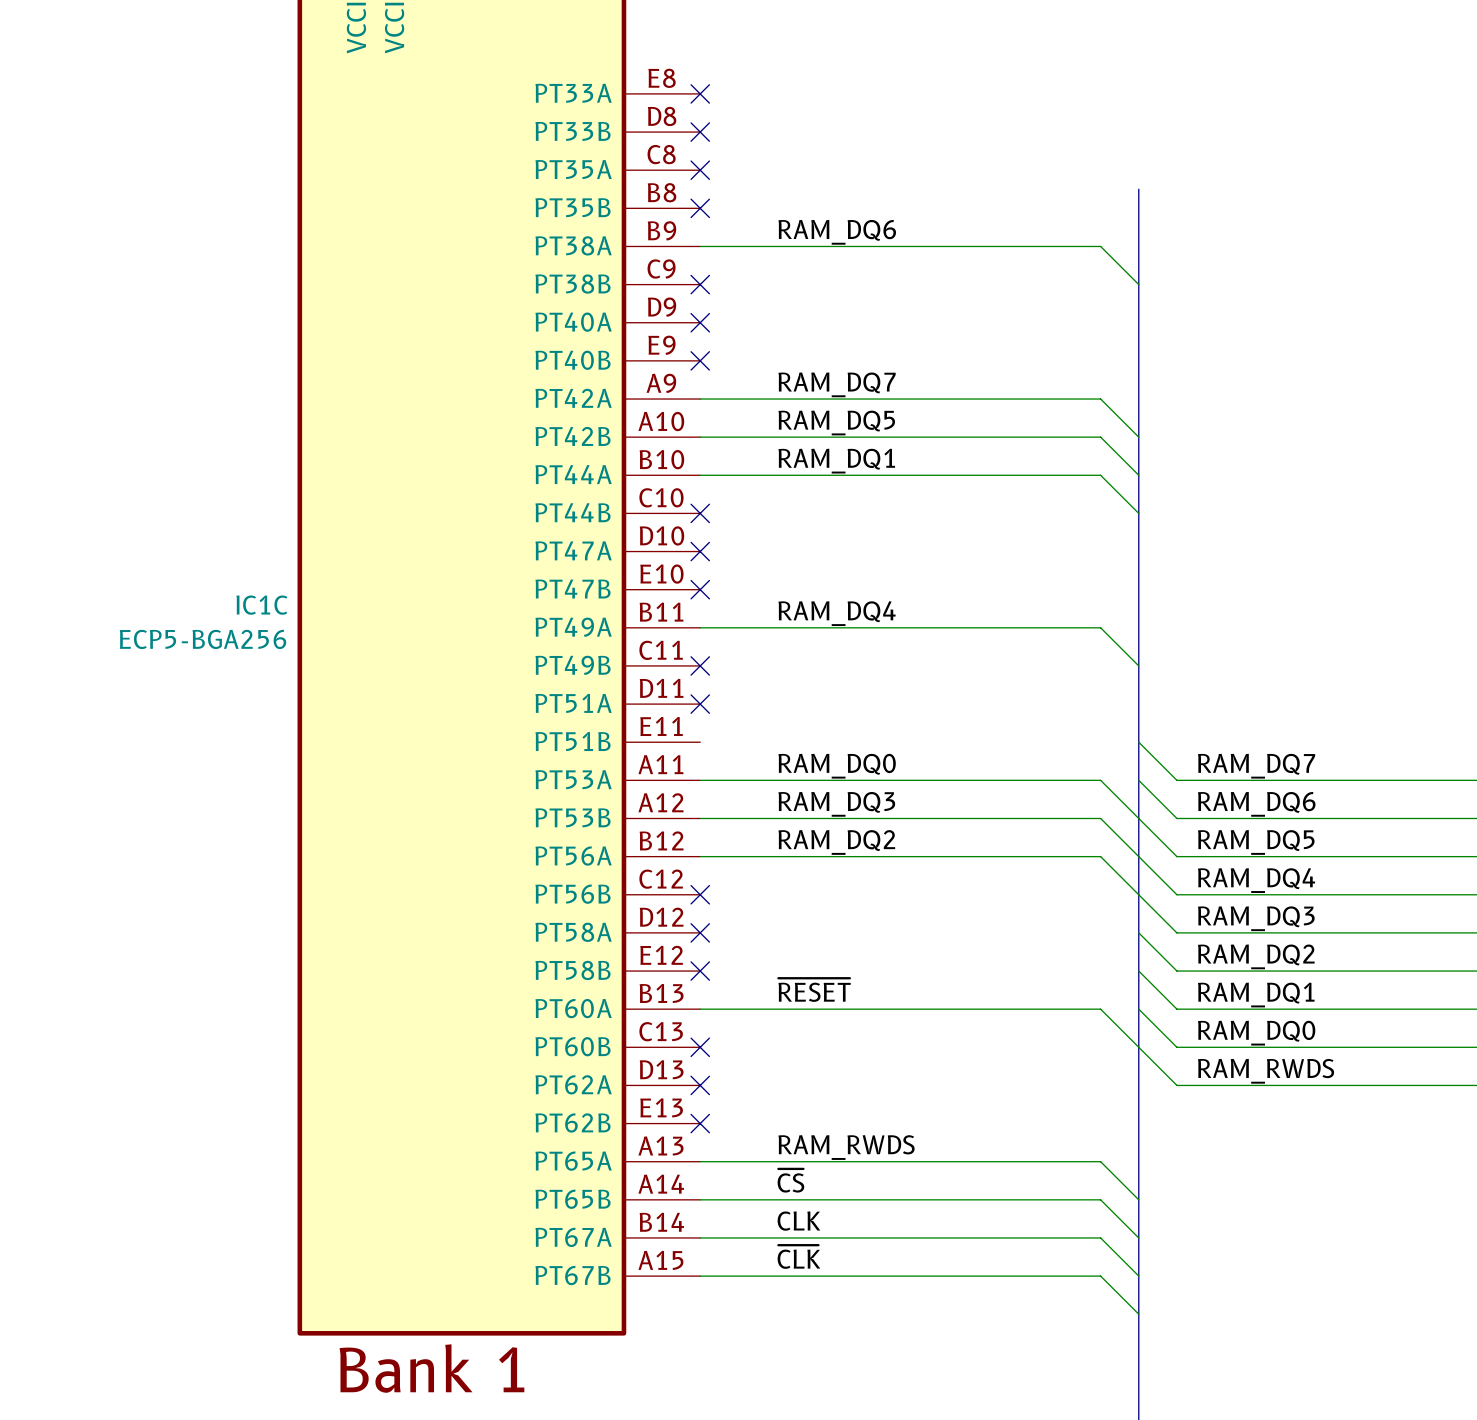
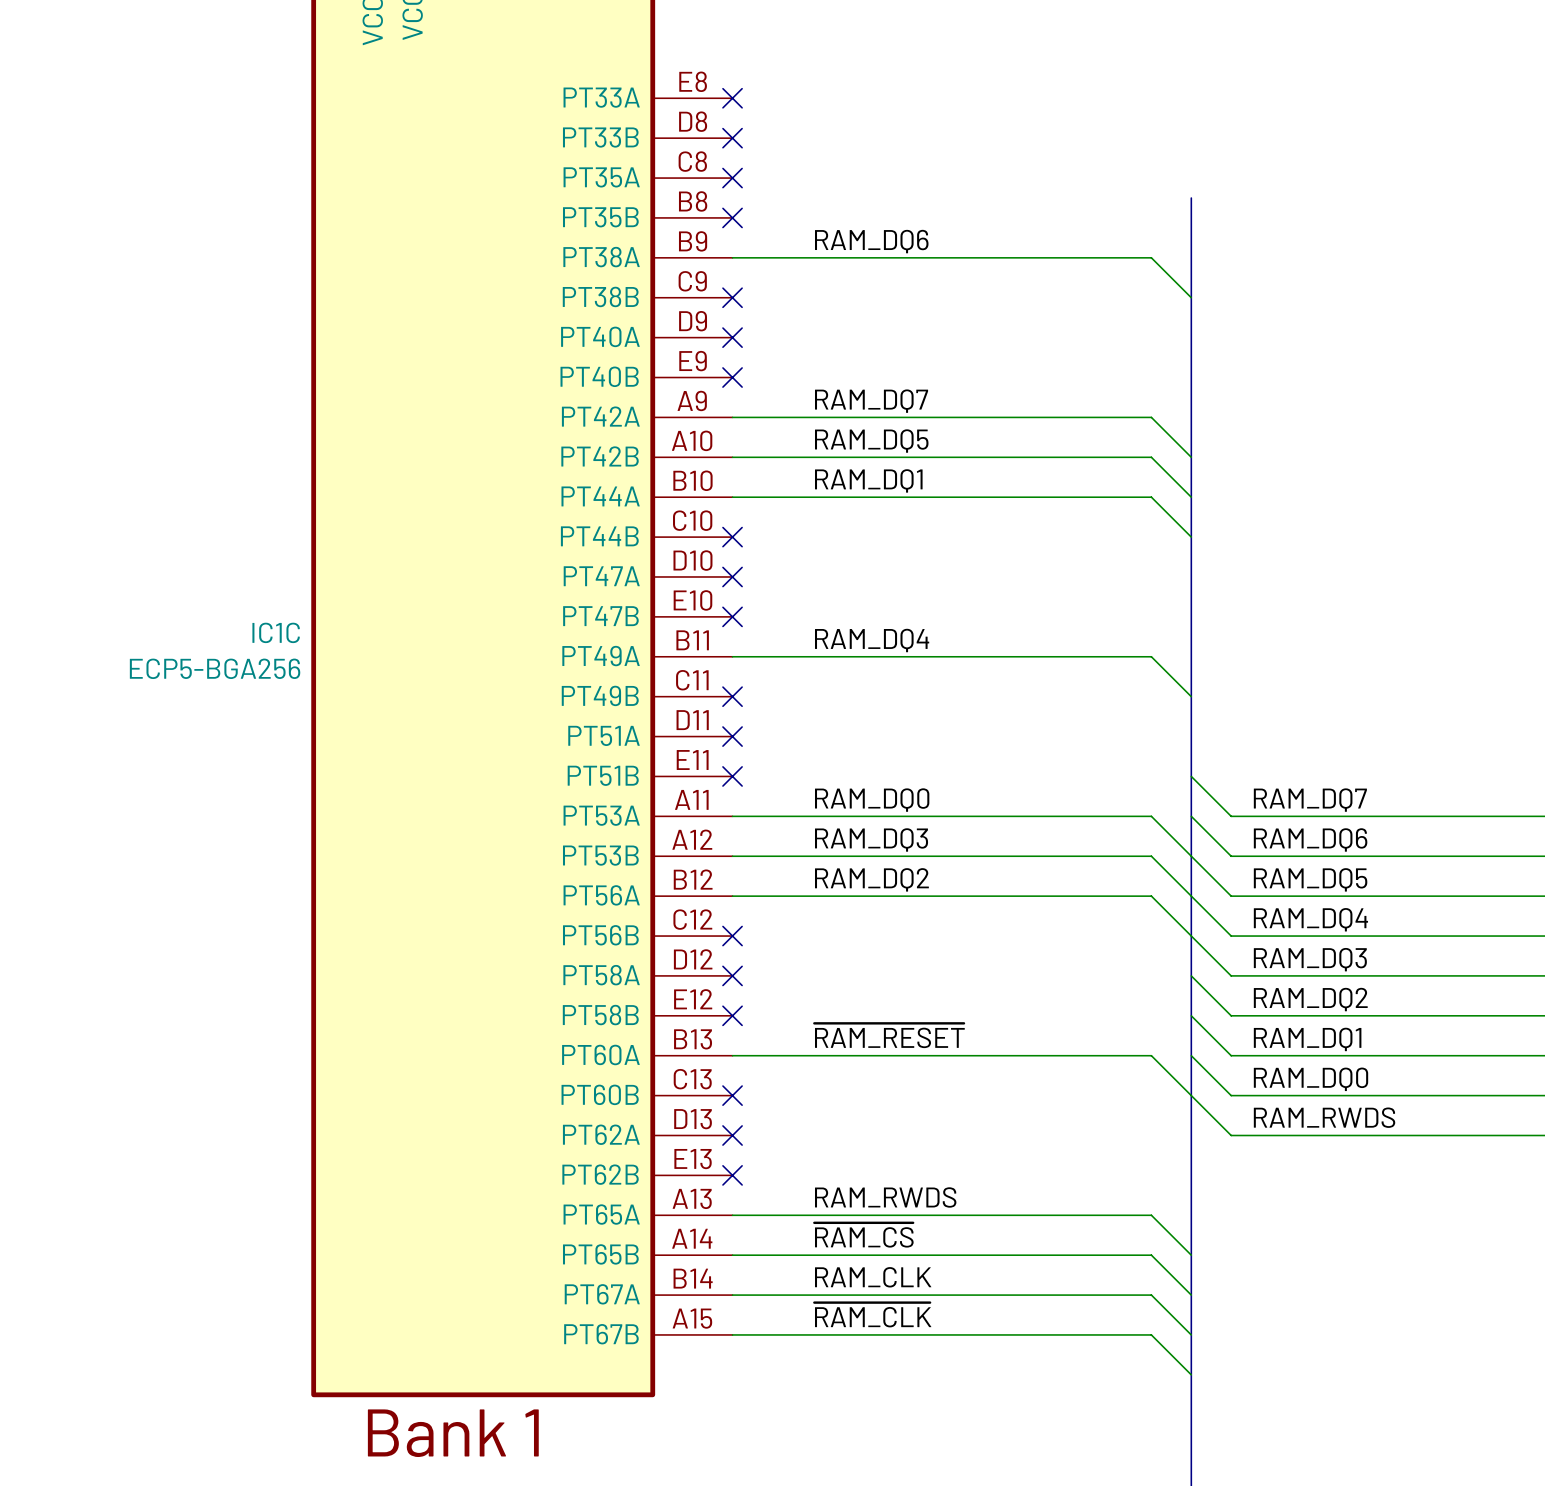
no-connect mark: none -> (732, 776)
label: ~{RESET} (814, 990) -> ~{RAM_RESET} (889, 1035)
label: ~{CS} (790, 1180) -> ~{RAM_CS} (863, 1235)
label: CLK (798, 1221) -> RAM_CLK (873, 1277)
label: ~{CLK} (798, 1257) -> ~{RAM_CLK} (872, 1315)

